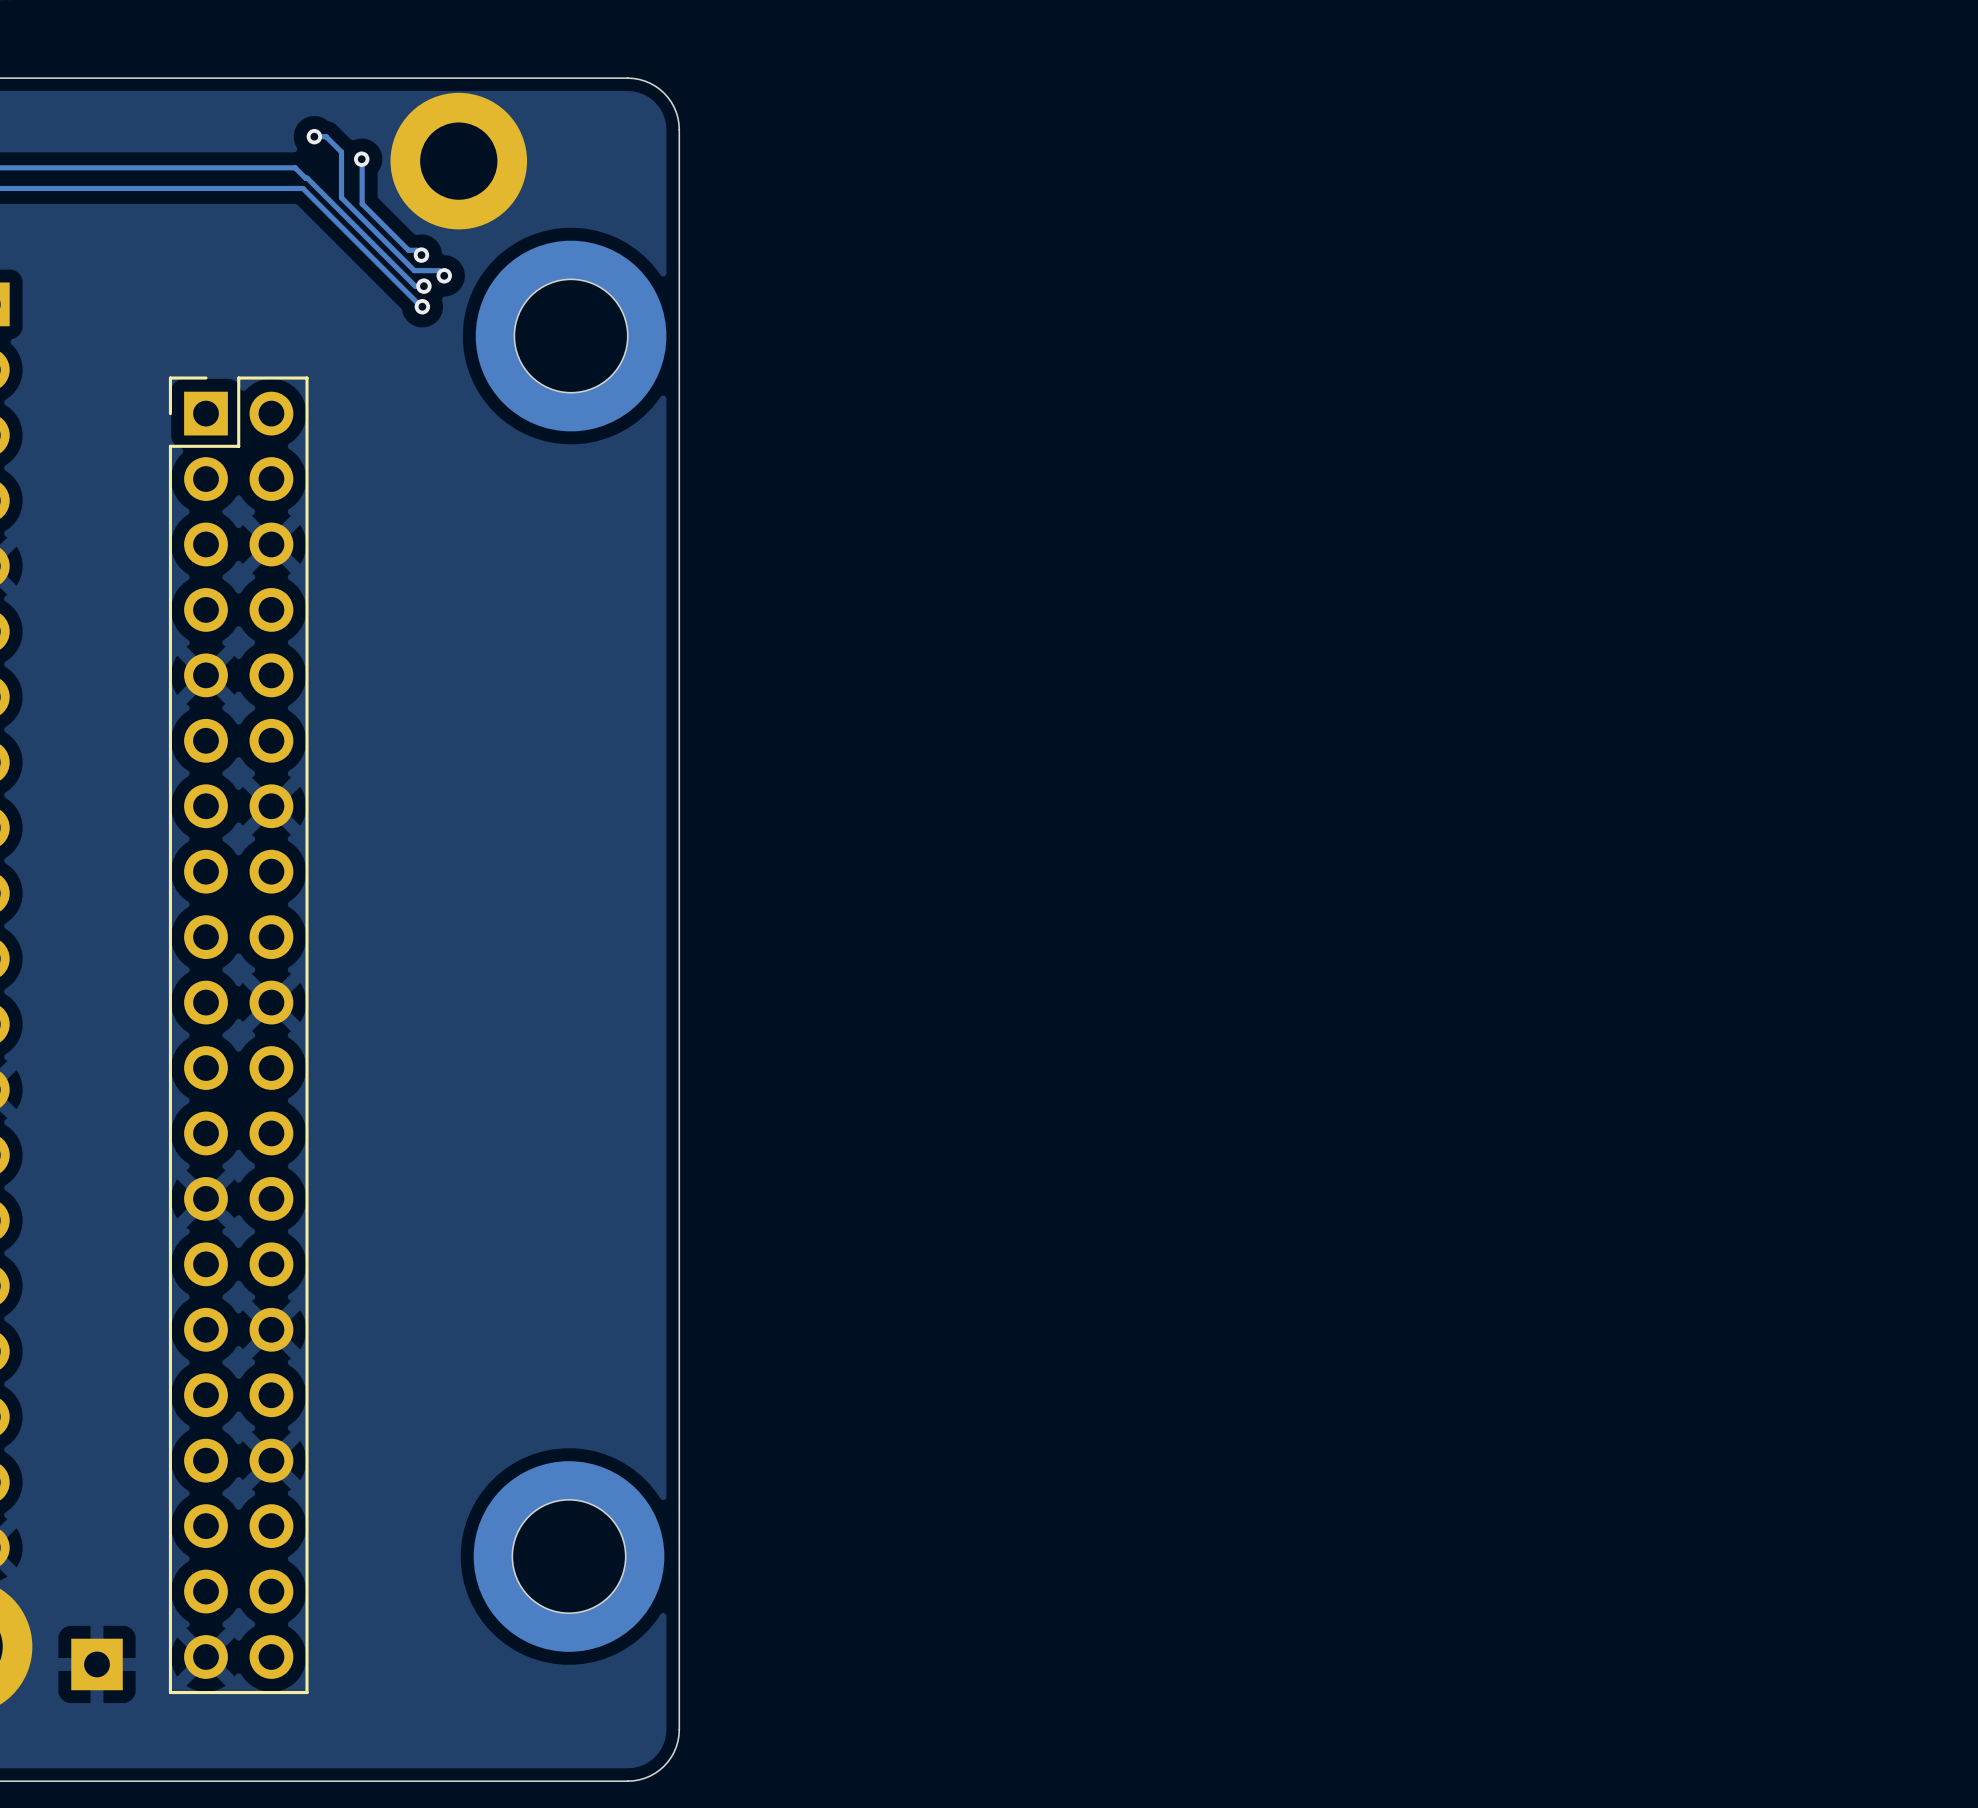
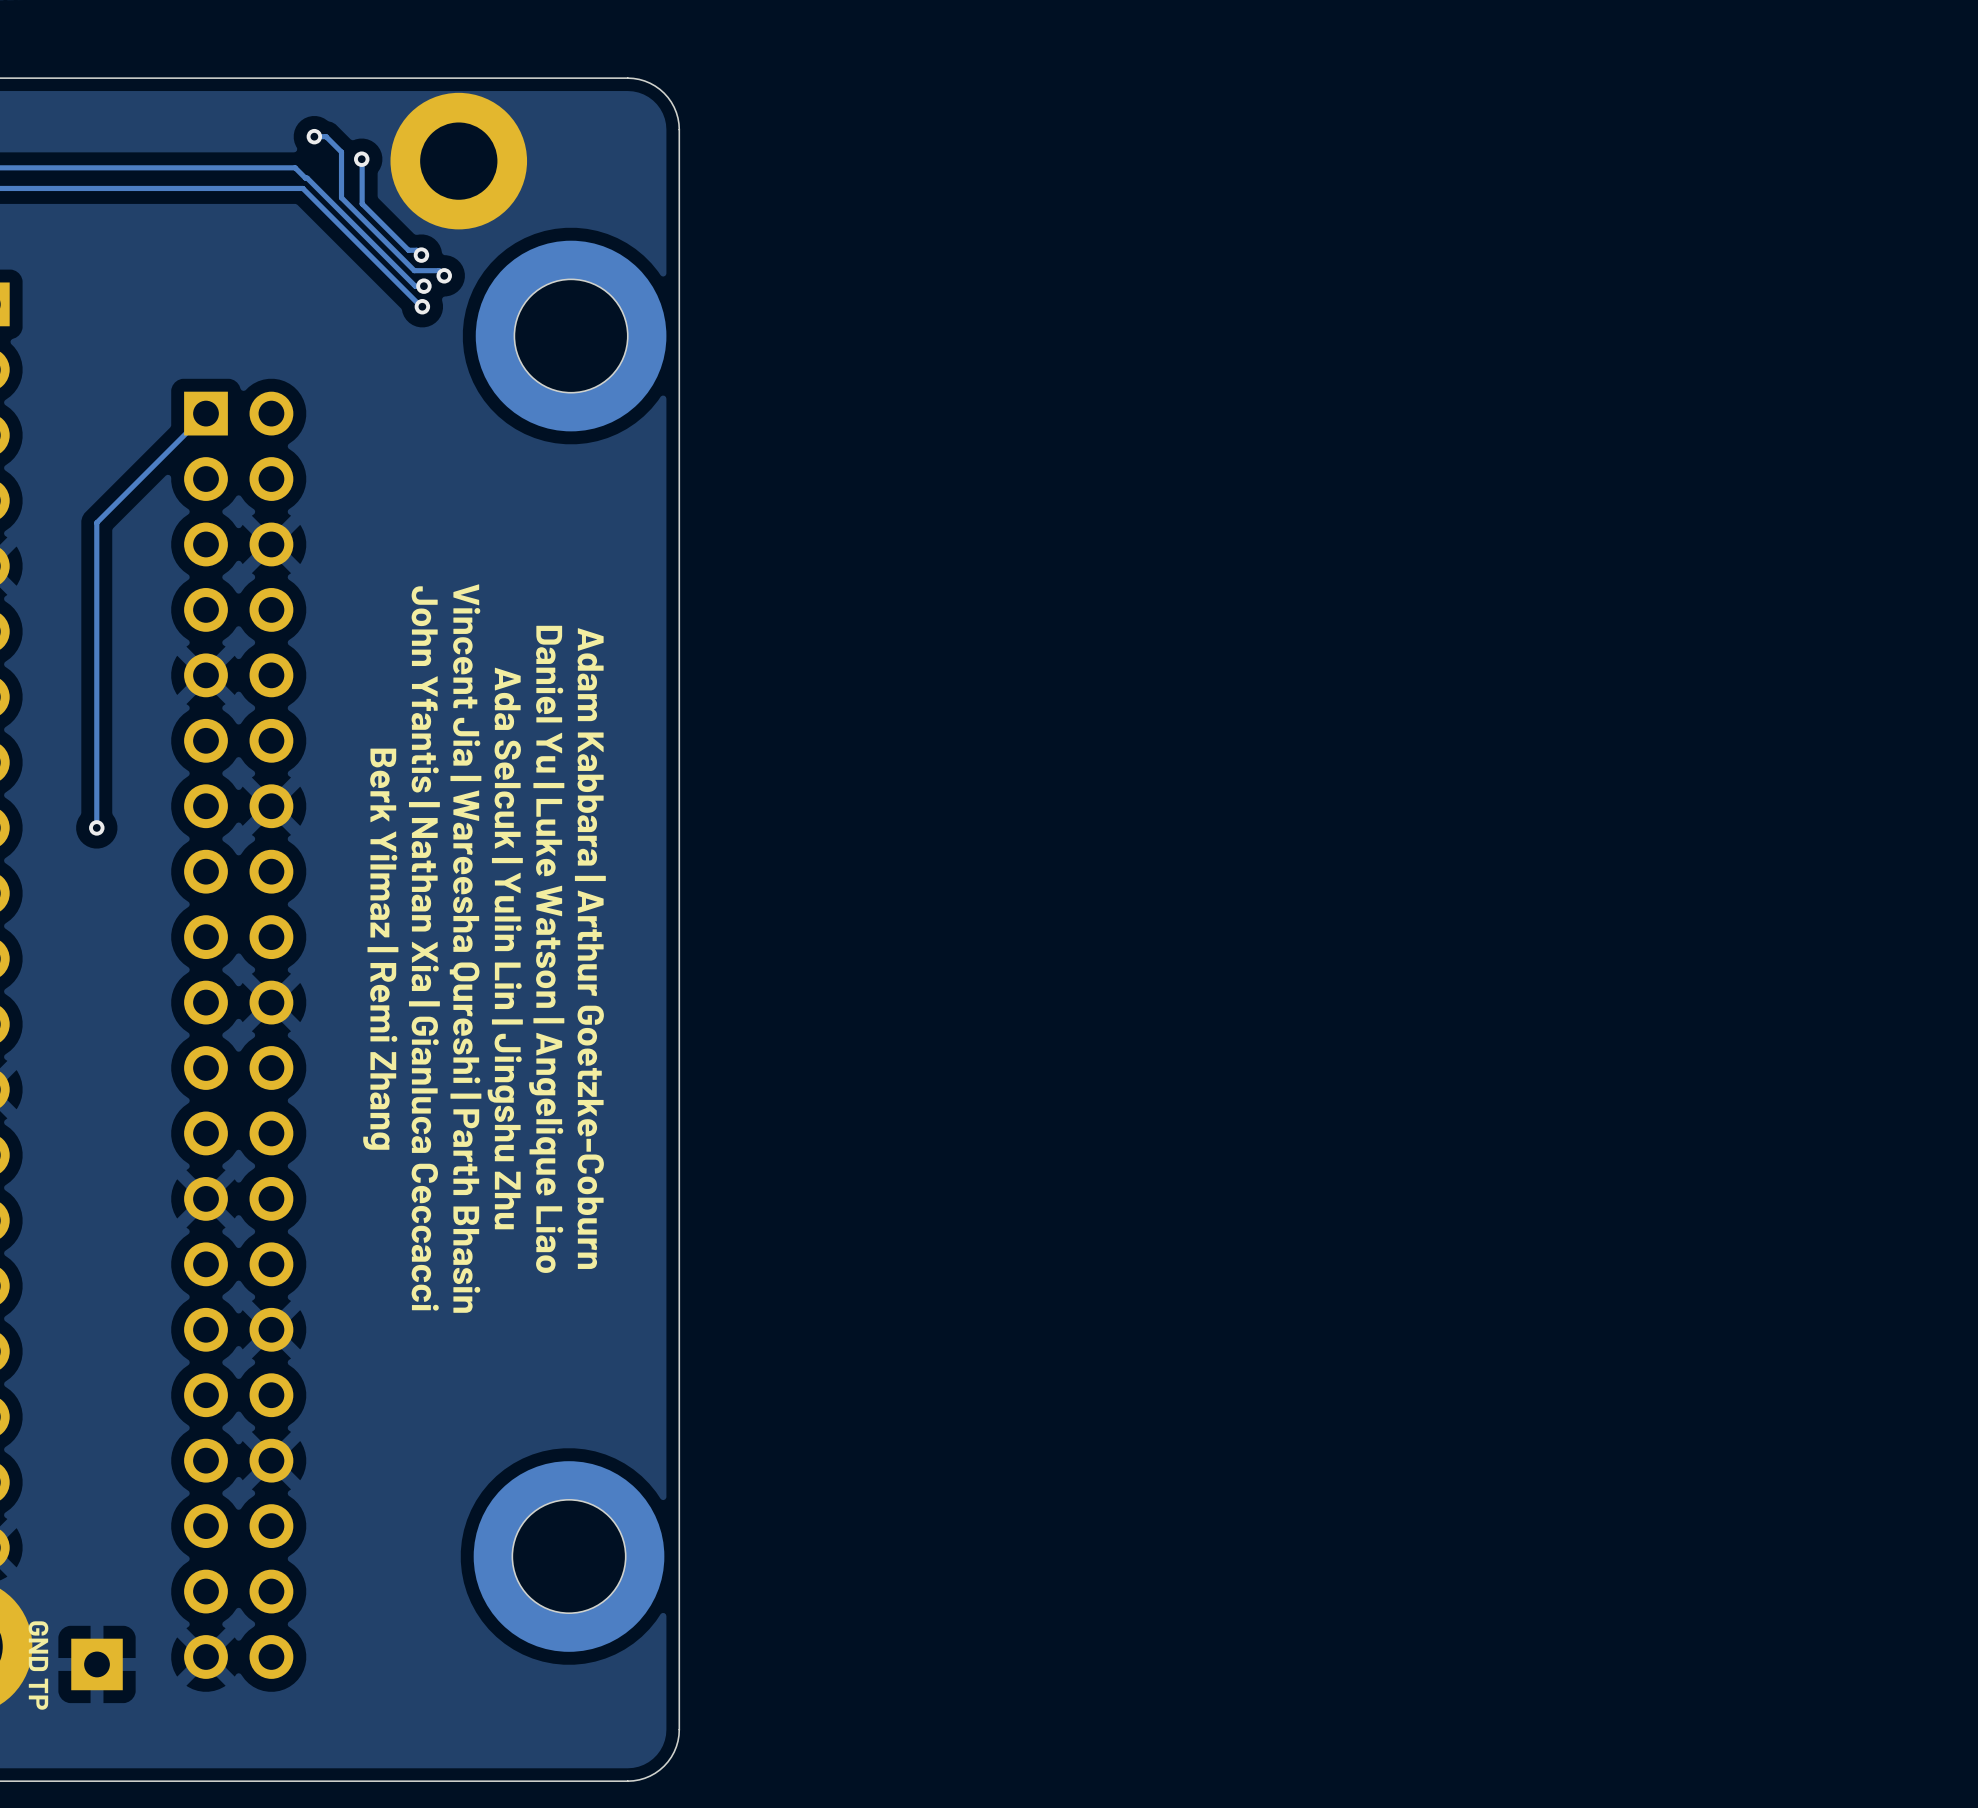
part footprint: [168, 376, 309, 1695] -> [184, 391, 294, 1679]
track: none -> (206, 413) (96, 522) (96, 827)
via: none -> (96, 827)
text: none -> John Yfantis | Nathan Xia | Gianluca Ceccacci (424, 948)
text: none -> Vincent Jia | Wareesha Qureshi | Parth Bhasin (465, 948)
text: none -> Ada Selcuk | Yulin Lin | Jingshu Zhu (505, 948)
text: none -> Adam Kabbara | Arthur Goetzke-Coburn (590, 948)
text: none -> Berk Yilmaz | Remi Zhang (380, 949)
text: none -> Daniel Yu | Luke Watson | Angelique Liao (546, 949)
text: none -> GND TP (38, 1665)

